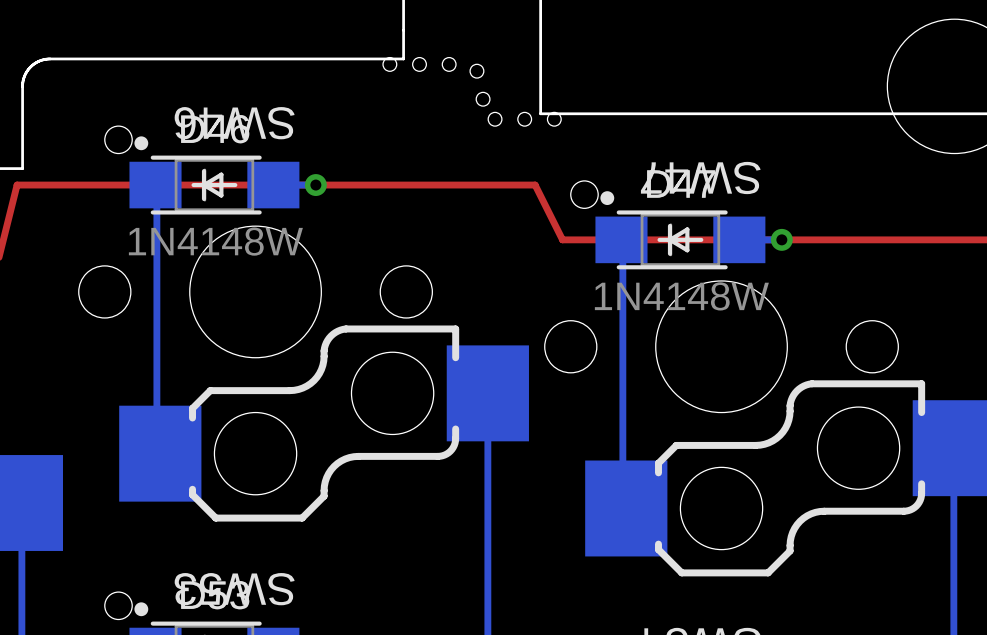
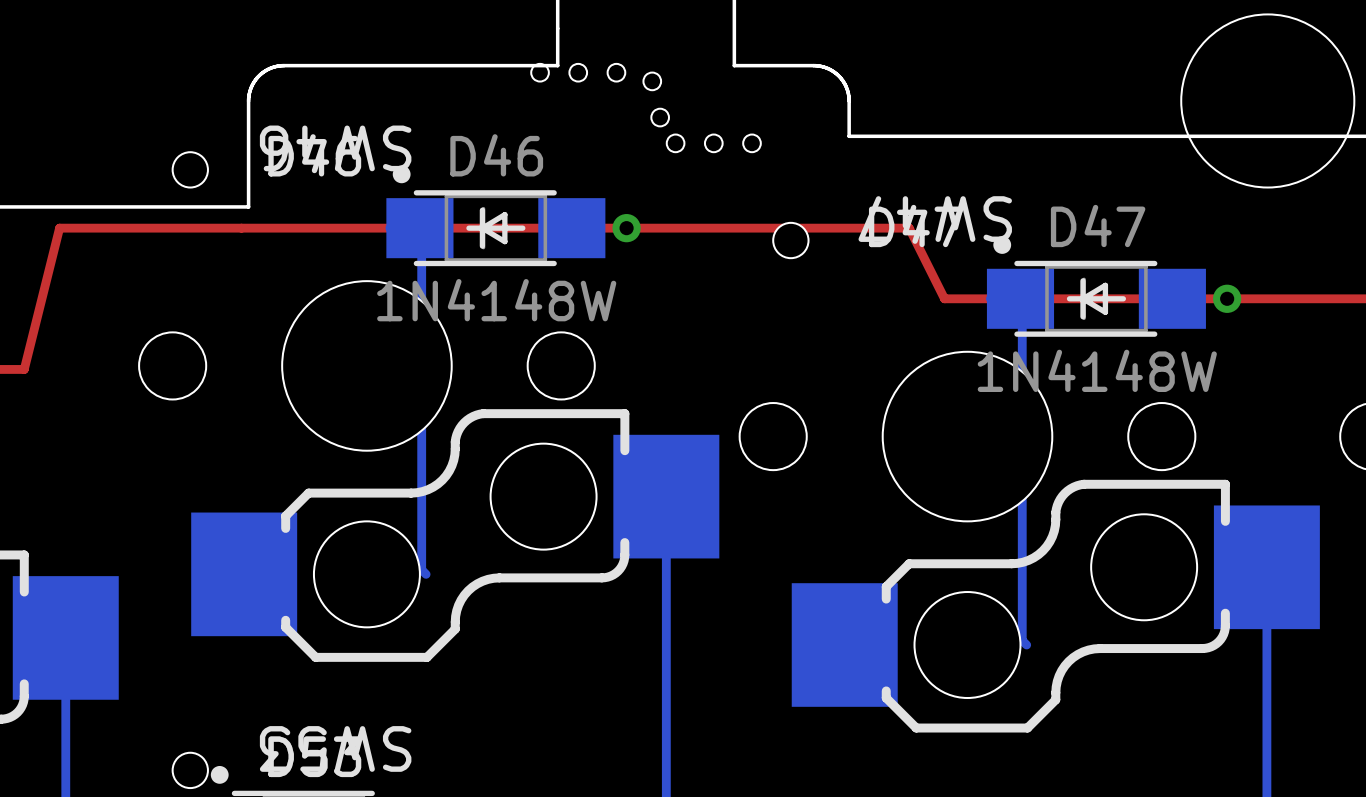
board edge: (191, 58) (48, 58) (35, 63) (26, 71) (22, 83) (22, 168) -> (283, 65) (271, 67) (262, 73) (253, 82) (249, 92) (248, 206) (66, 206)
board edge: (540, 58) (540, 113) (629, 113) -> (734, 65) (815, 65) (832, 70) (842, 80) (848, 92) (849, 136)
D46 position: (214, 175) -> (495, 215)
bottom track: (155, 185) (156, 450) (160, 453) -> (419, 228) (421, 229) (421, 569) (426, 574)
via position: (315, 185) -> (626, 228)
top track: (535, 185) (562, 239) (703, 239) -> (727, 228) (909, 228) (944, 298)
D47 position: (680, 230) -> (1096, 286)
bottom track: (621, 239) (622, 505) (626, 508) -> (1020, 298) (1022, 300) (1022, 640) (1026, 645)
via position: (781, 239) -> (1227, 298)

